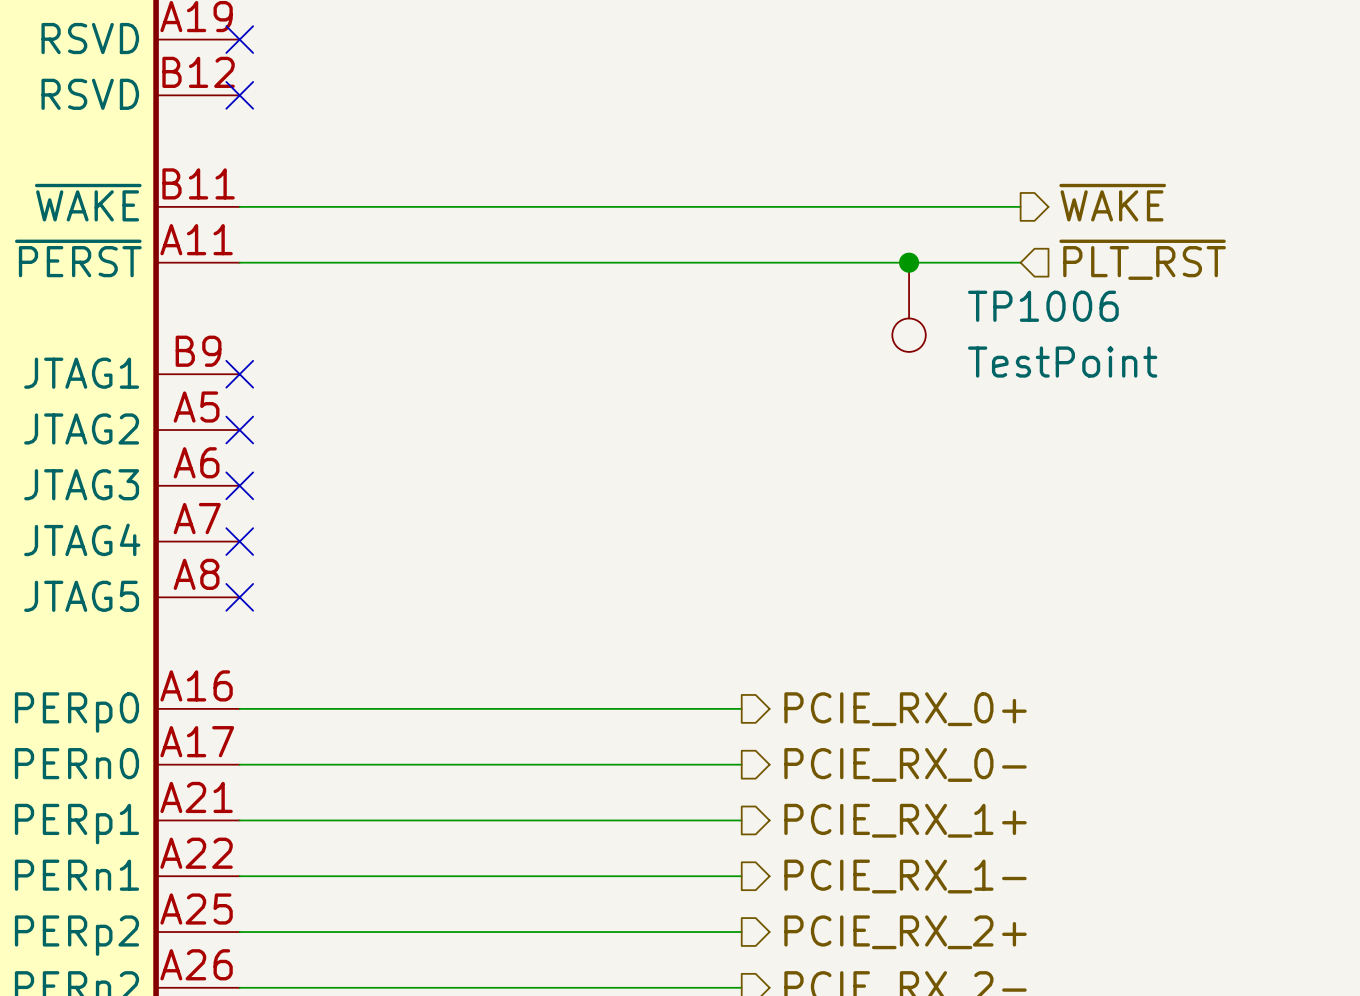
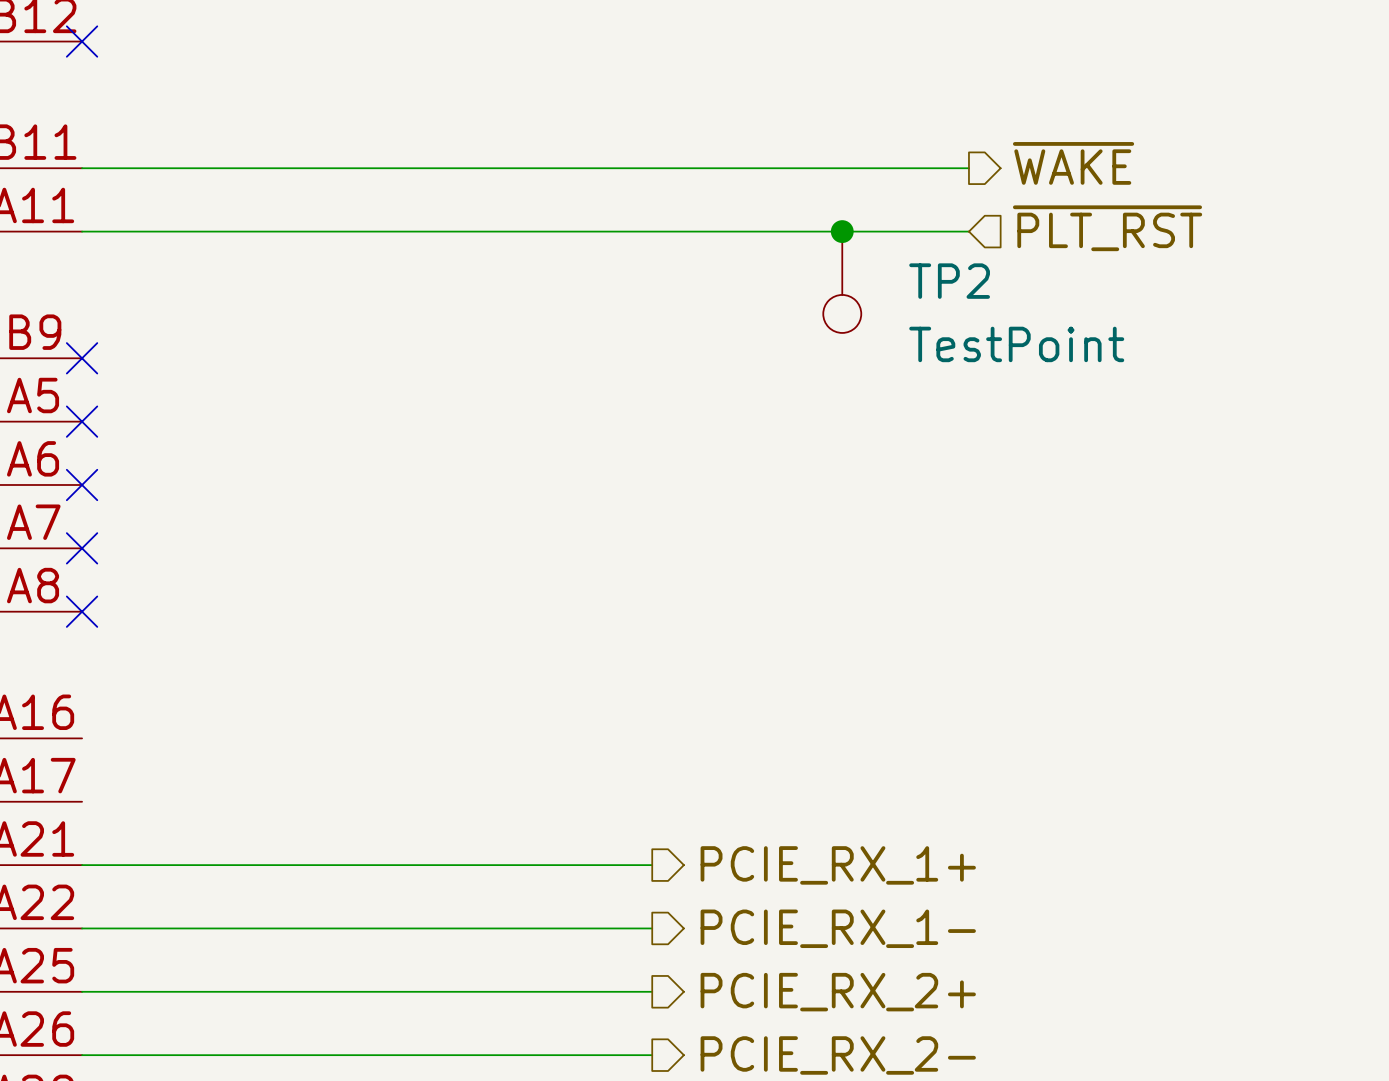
TP1006 name: TP1006 (1043, 306) -> TP2 (949, 281)
wire: (239, 708) (741, 708) -> none
hierarchical label: PCIE_RX_0+ (905, 709) -> none
wire: (239, 764) (741, 764) -> none
hierarchical label: PCIE_RX_0- (905, 764) -> none

